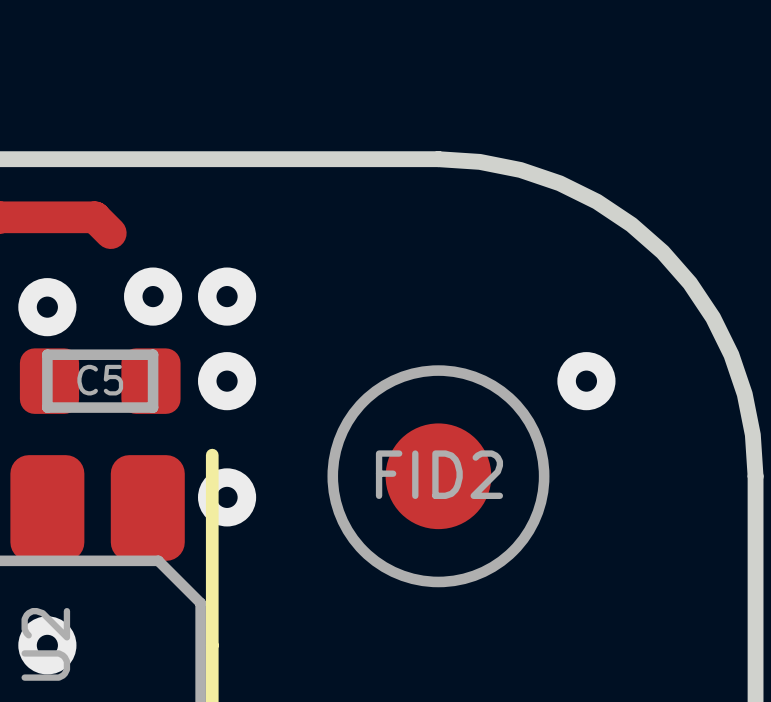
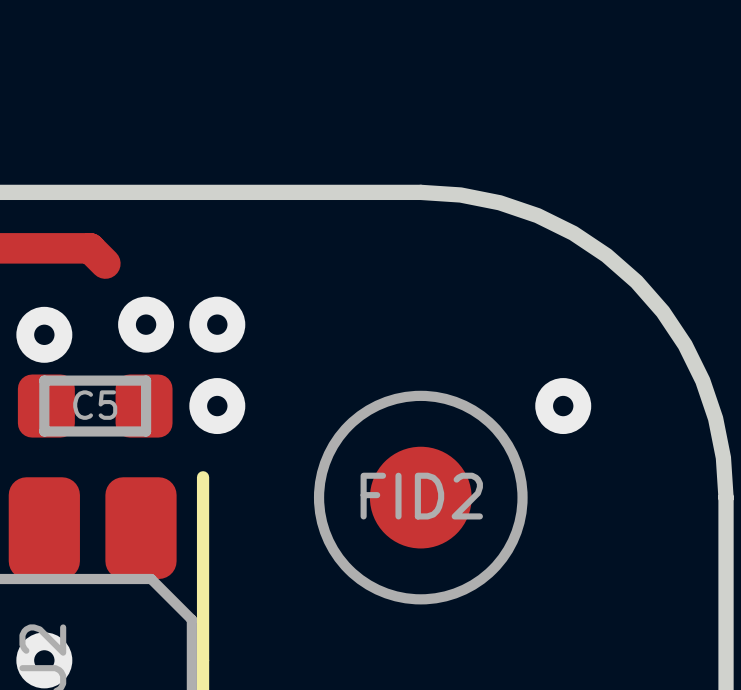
via: (227, 497) -> none

